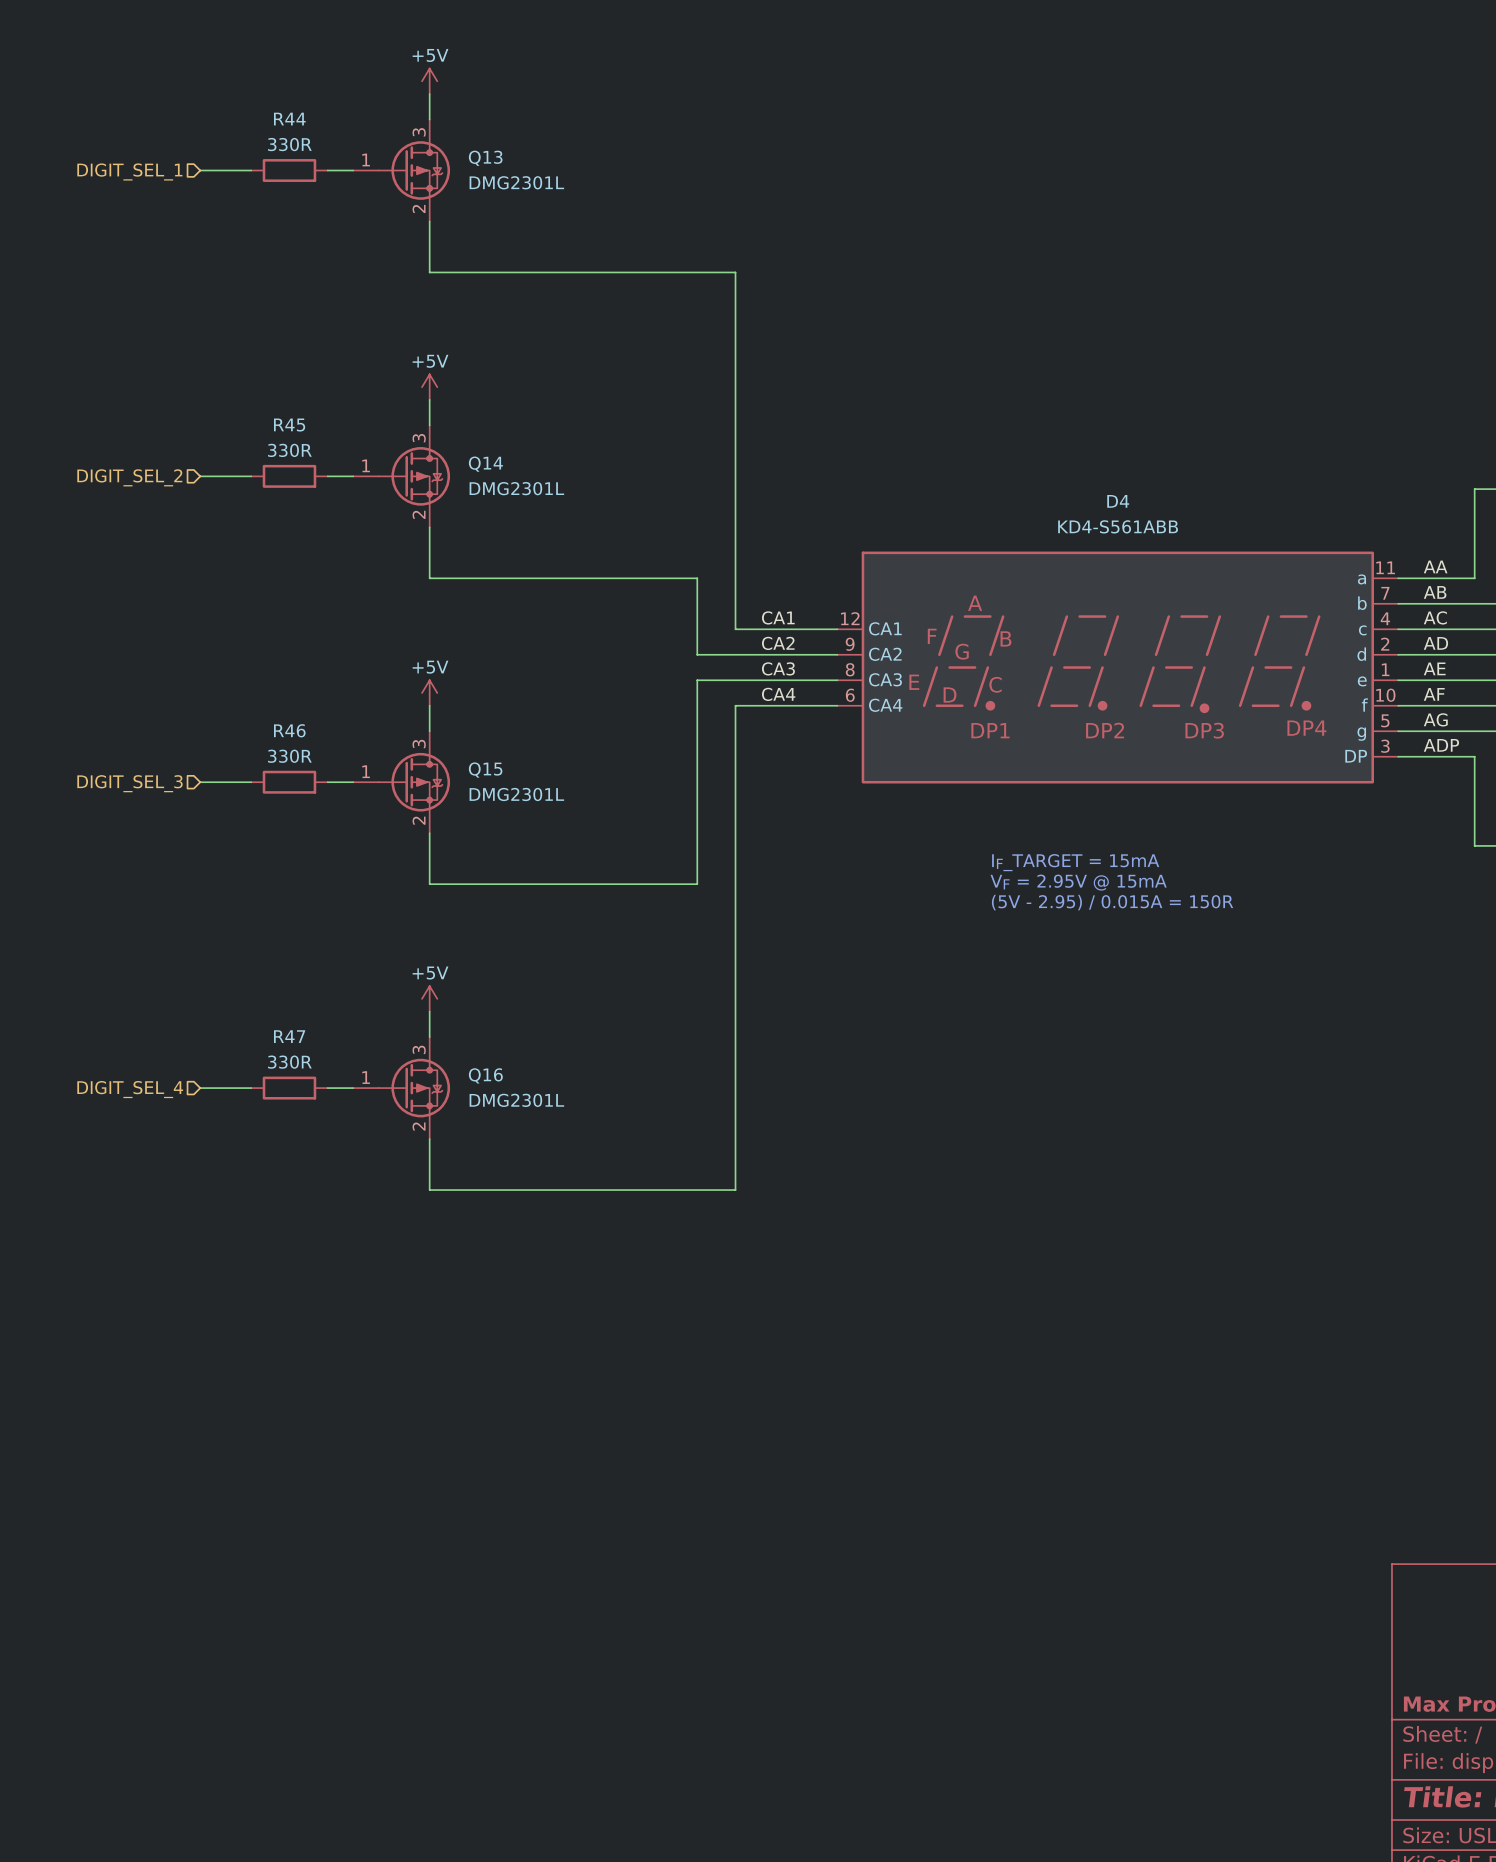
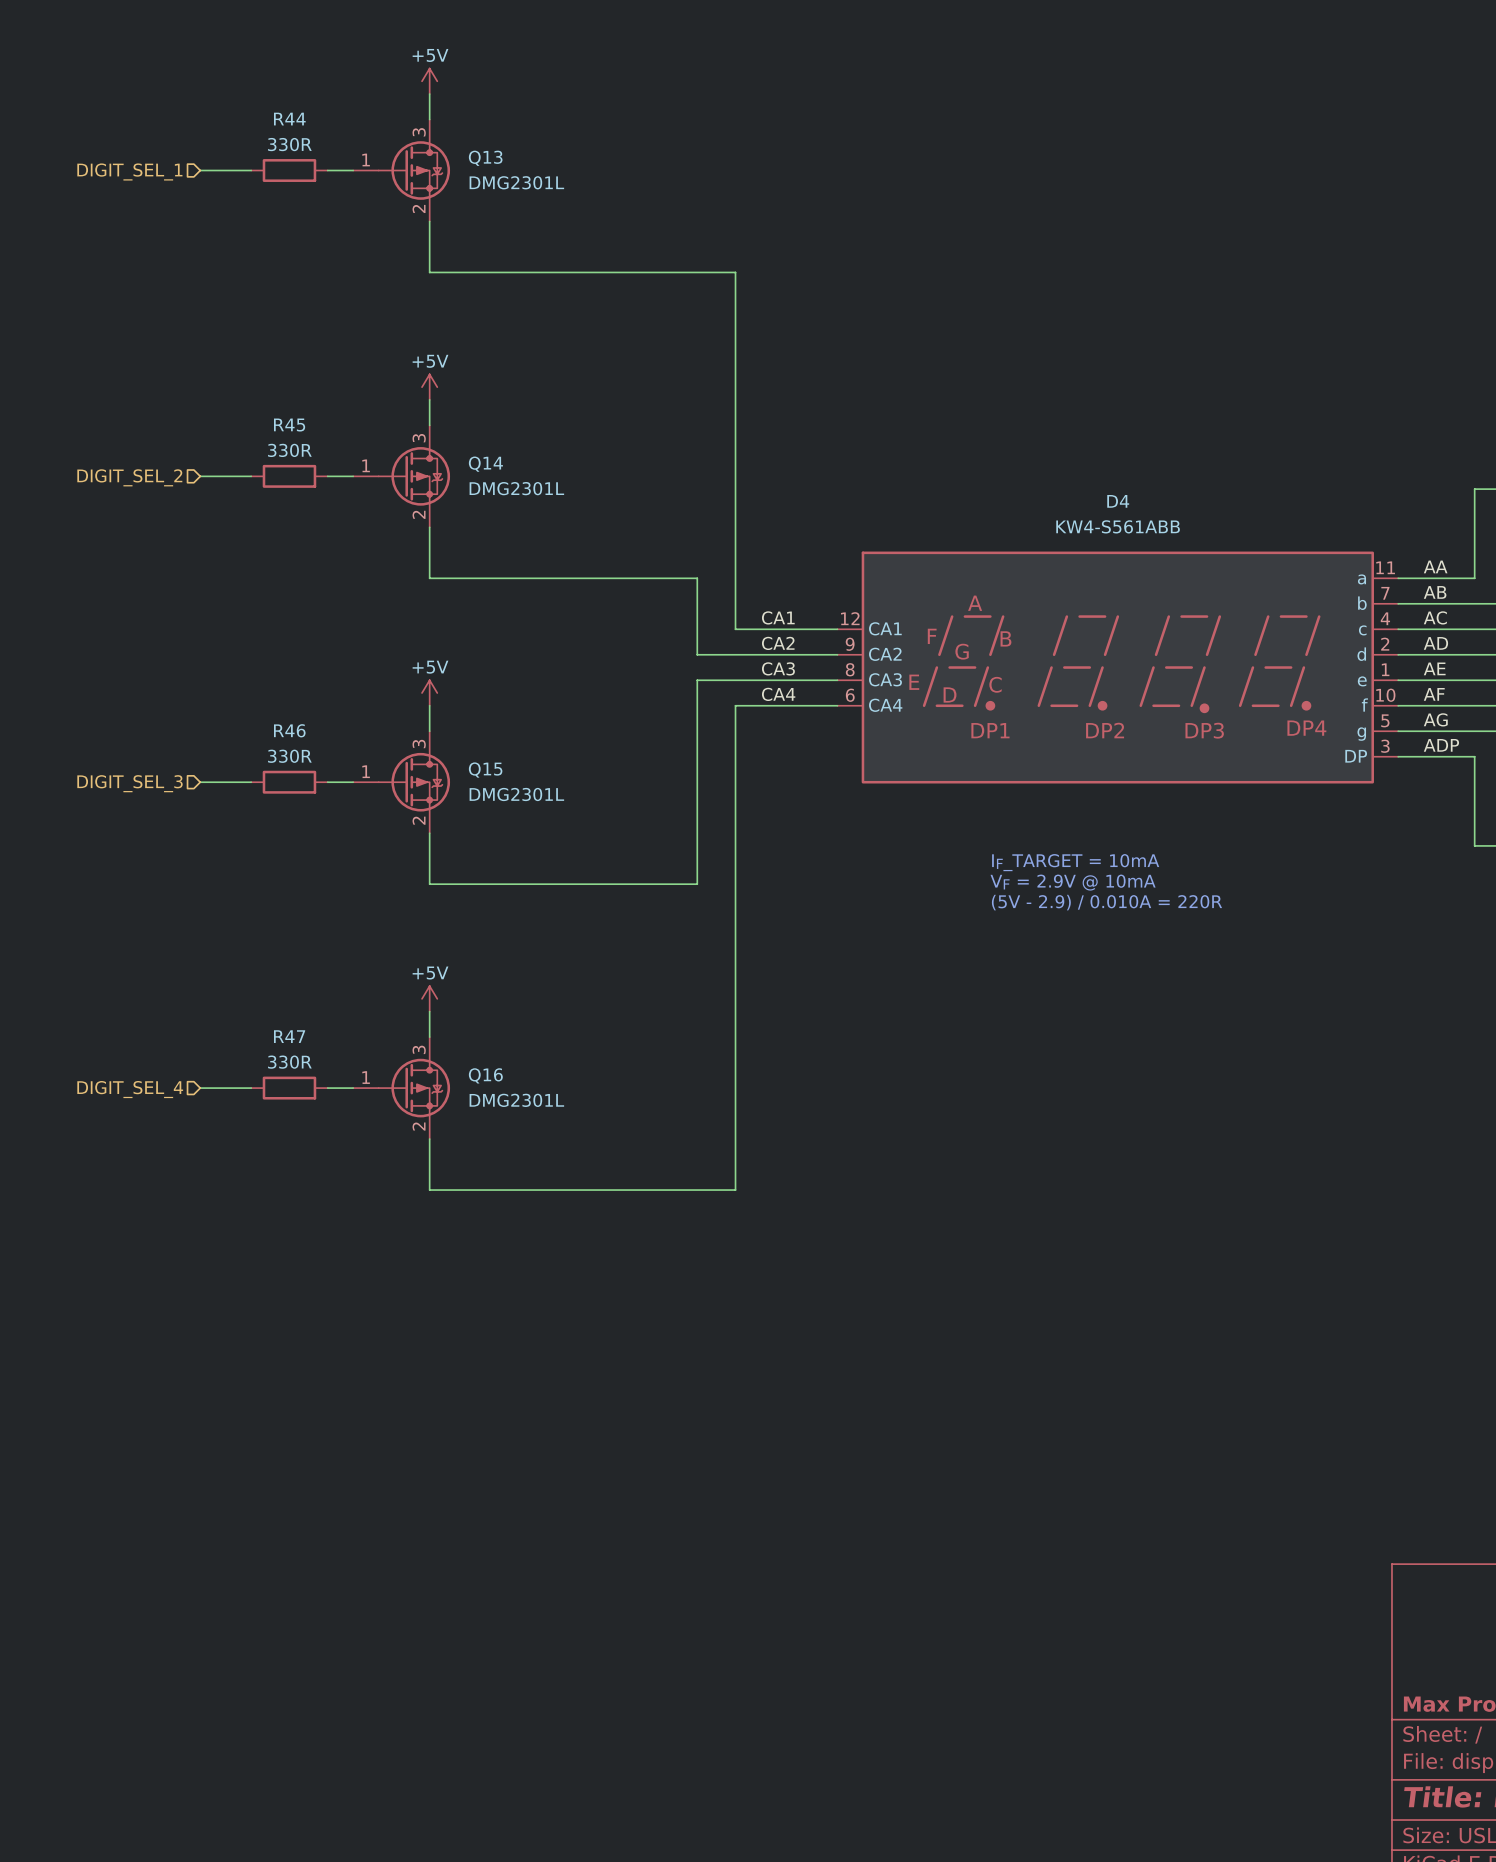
D4 value: KD4-S561ABB (1118, 526) -> KW4-S561ABB (1118, 526)
text: IF_TARGET = 15mA (1075, 862) -> IF_TARGET = 10mA (1075, 862)
text: VF = 2.95V @ 15mA (1078, 882) -> VF = 2.9V @ 10mA (1073, 882)
text: (5V - 2.95) / 0.015A = 150R (1112, 902) -> (5V - 2.9) / 0.010A = 220R (1107, 902)

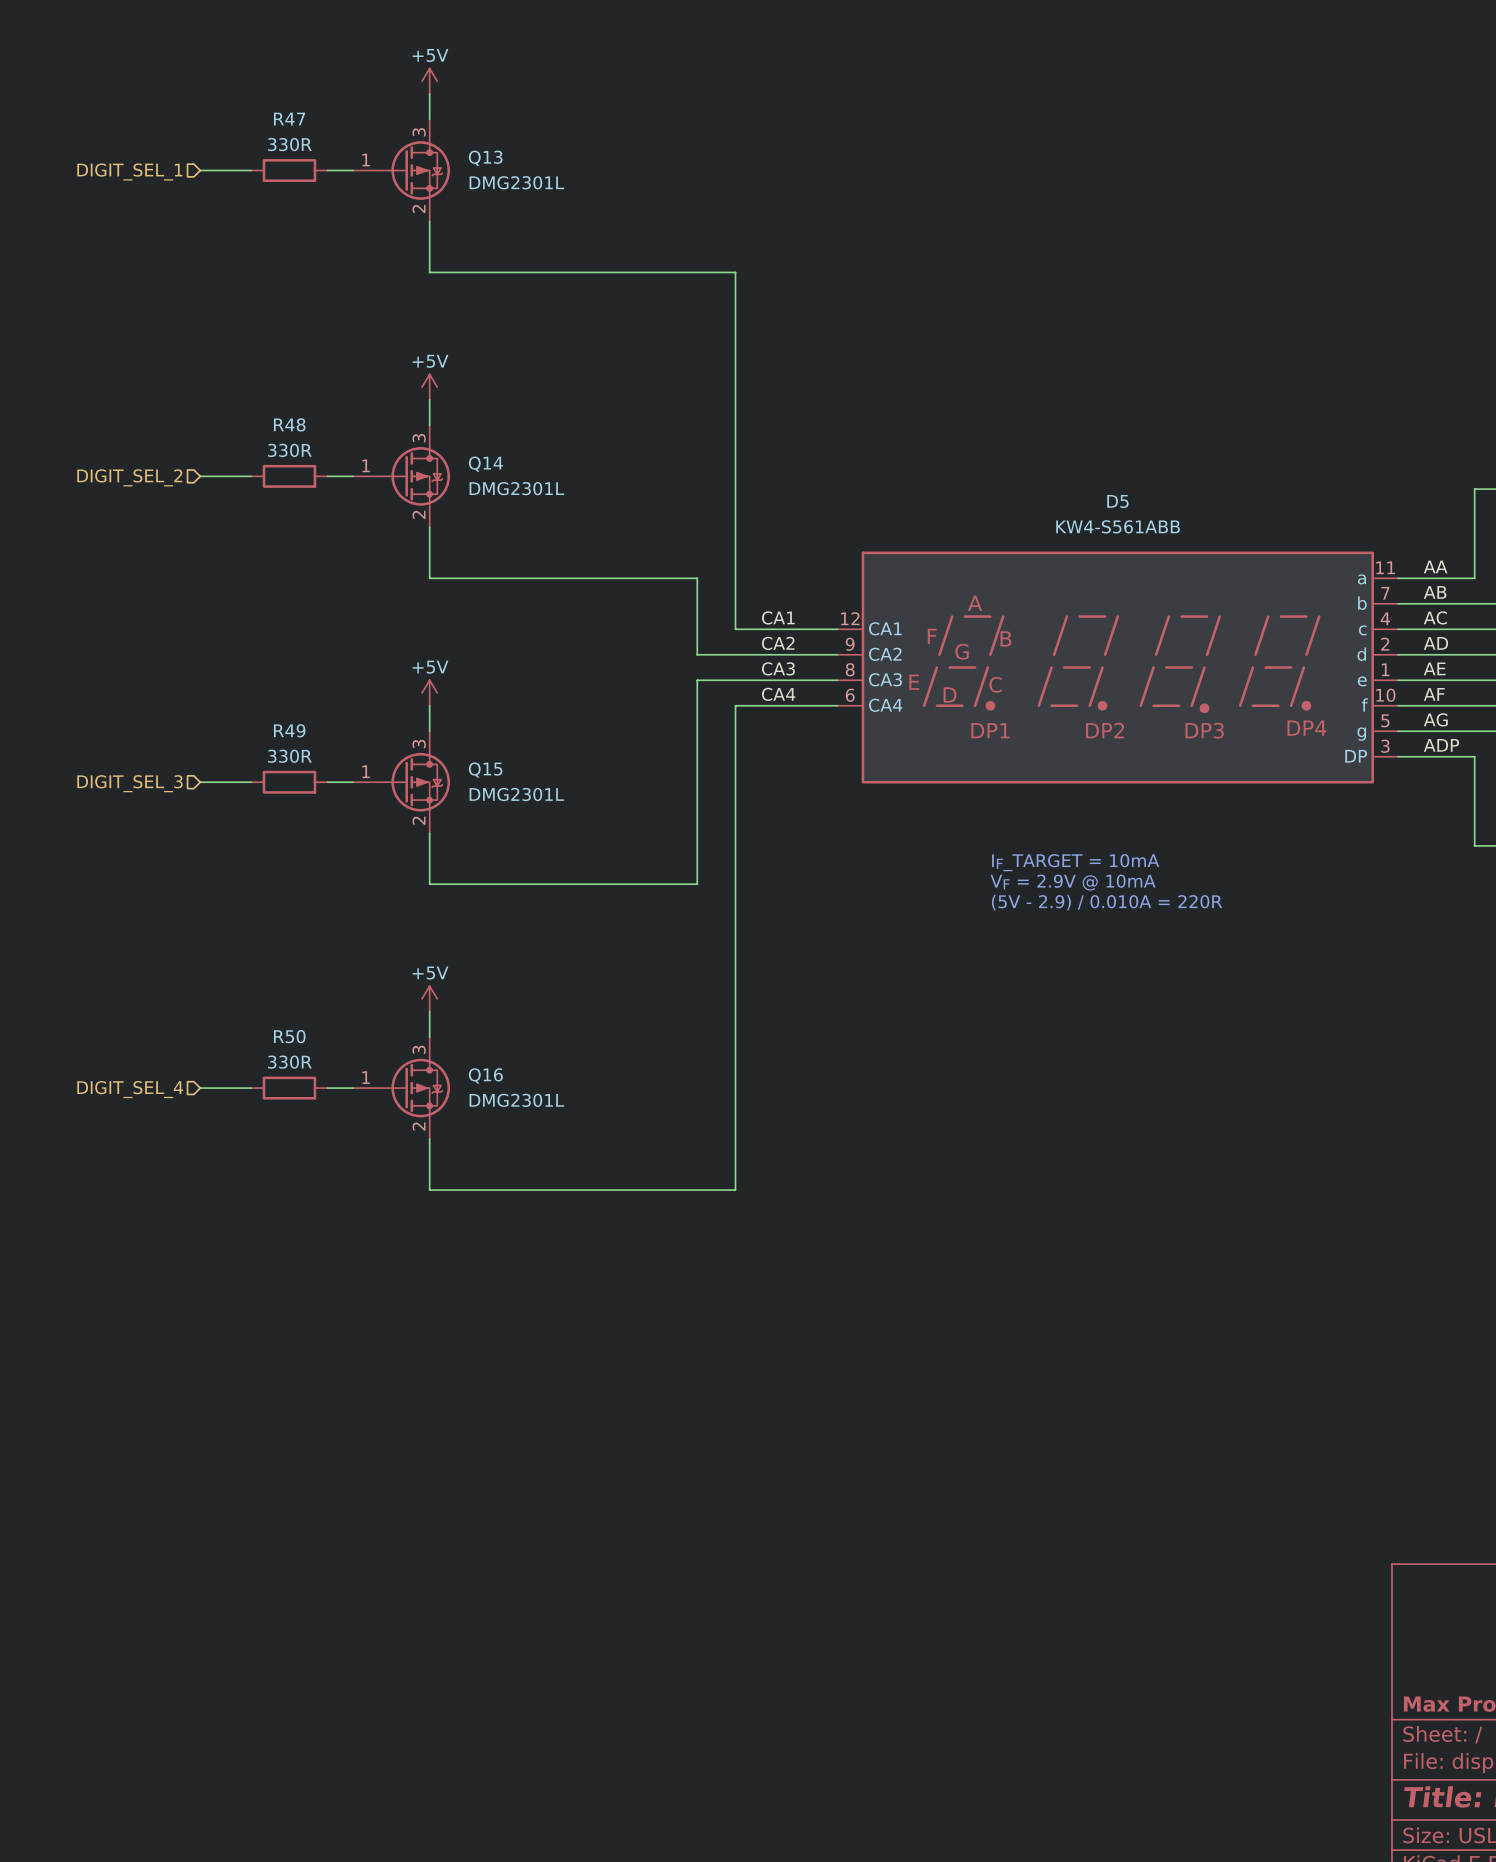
R44 name: R44 (289, 119) -> R47 (289, 119)
R45 name: R45 (289, 425) -> R48 (289, 424)
D4 name: D4 (1118, 501) -> D5 (1117, 501)
R46 name: R46 (289, 730) -> R49 (289, 730)
R47 name: R47 (289, 1036) -> R50 (289, 1036)

